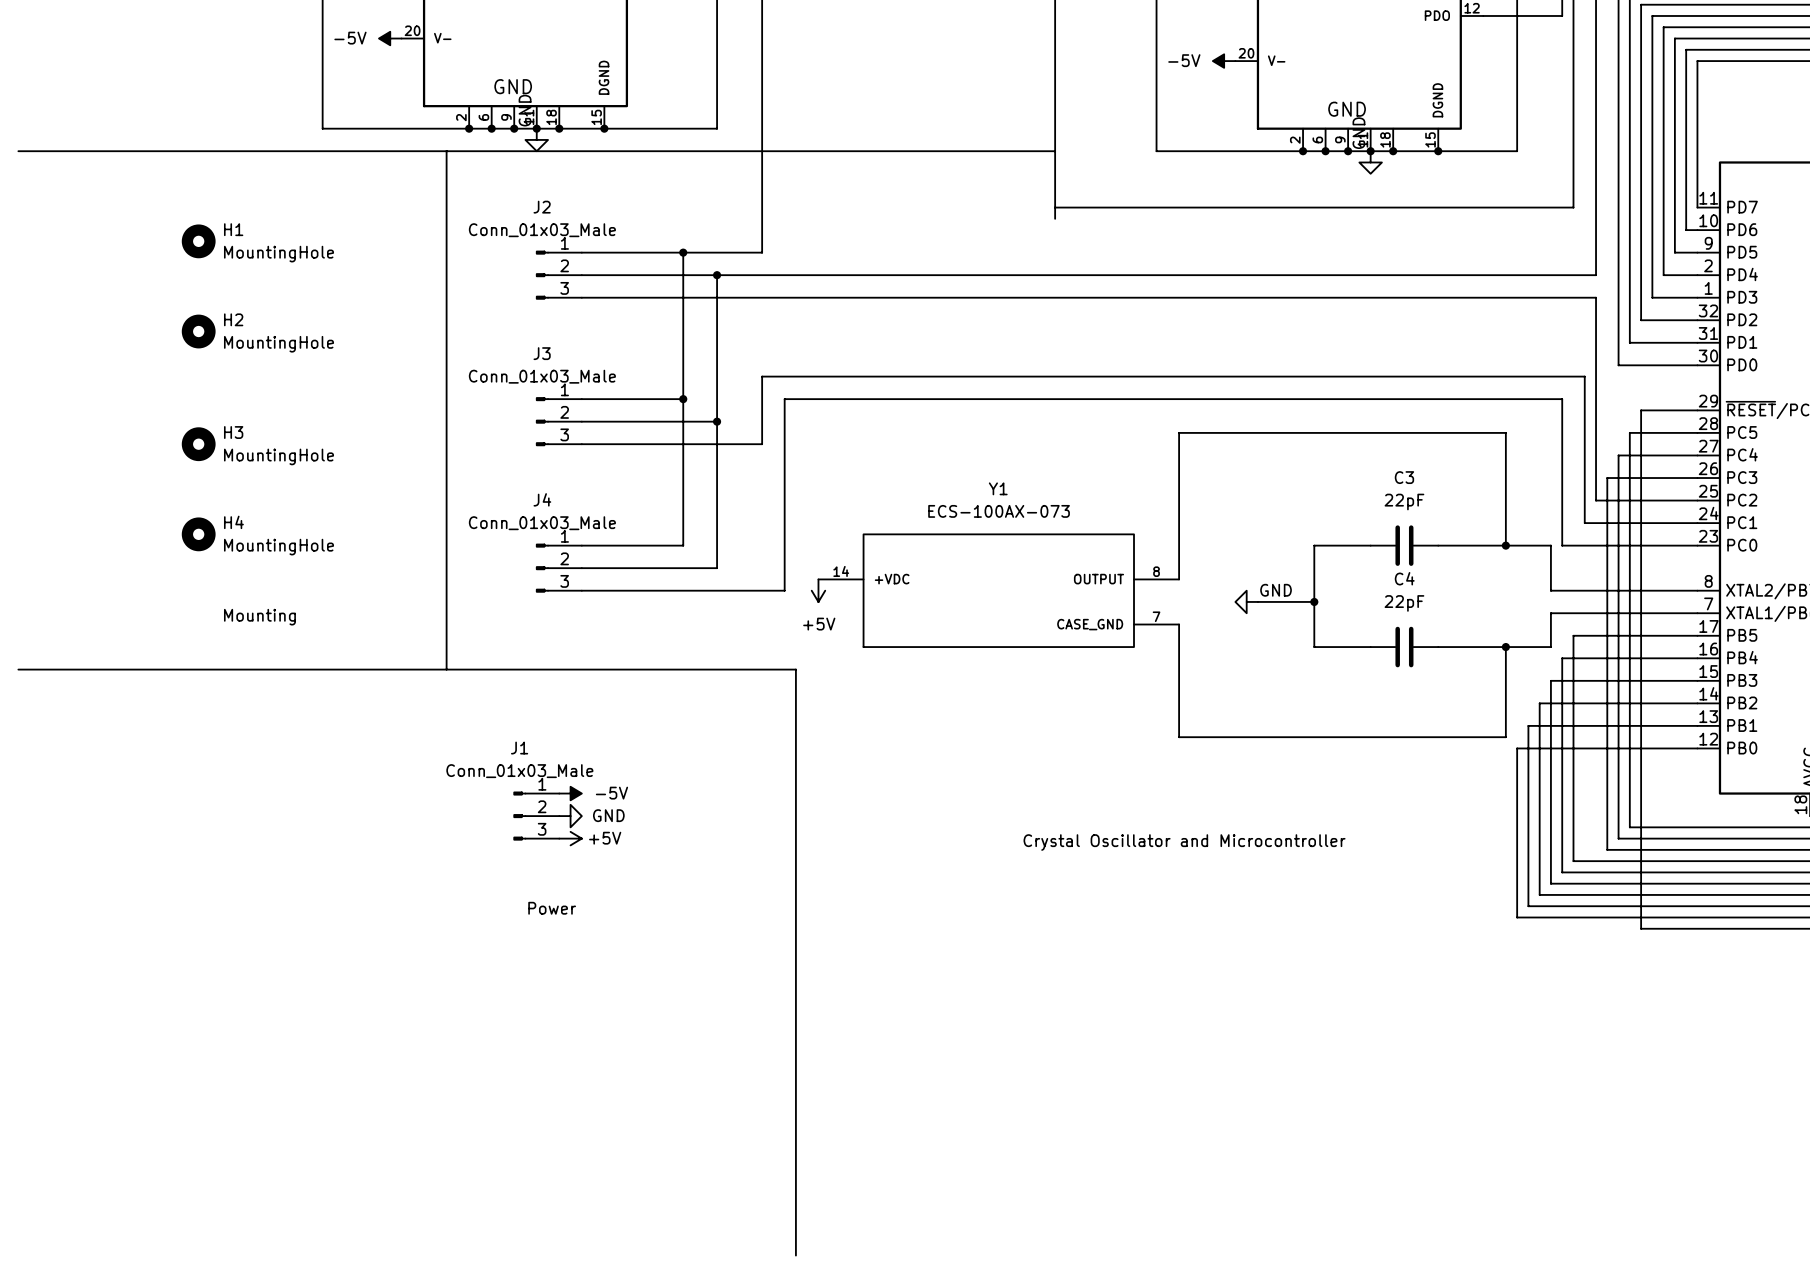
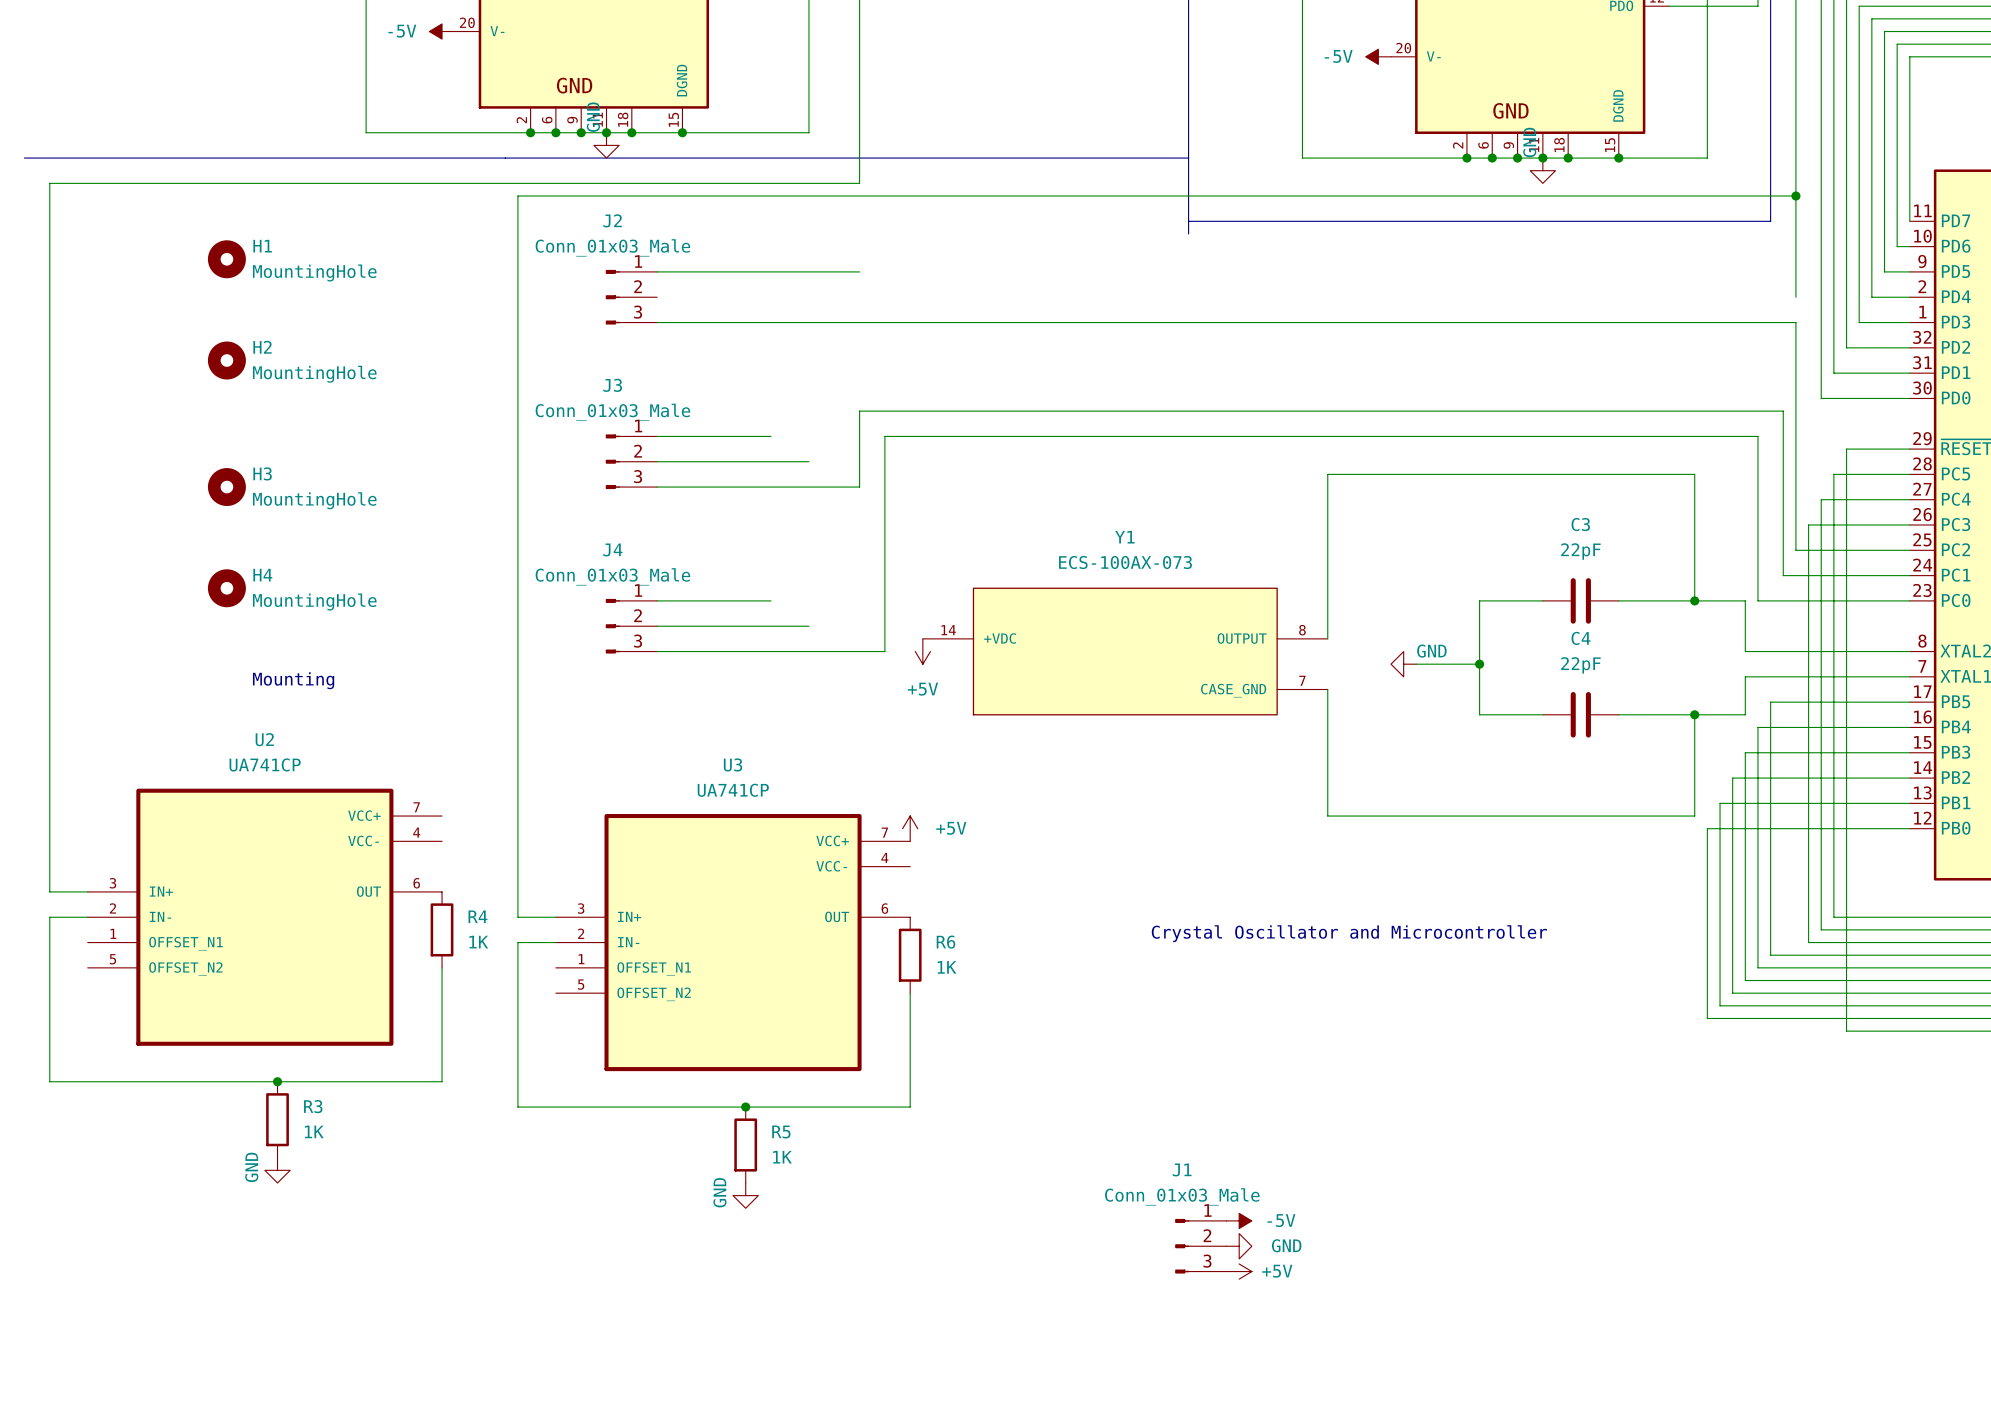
line: (446, 151) (446, 669) -> none
wire: (762, 173) (762, 252) -> (859, 183) (49, 183) (49, 891) (87, 891)
wire: none -> (1795, 196) (517, 196) (517, 917) (555, 917)
junction: none -> (1795, 196)
wire: (683, 252) (683, 545) -> none
junction: (683, 252) -> none
wire: (581, 275) (1596, 275) -> none
wire: (717, 275) (717, 568) -> none
junction: (717, 275) -> none
junction: (683, 399) -> none
junction: (717, 421) -> none
line: (18, 669) (795, 669) (795, 1255) -> none
power symbol: none -> +5V (910, 828)
power symbol: -5V (570, 793) -> none
J1 position: (536, 816) -> (1200, 1246)
power symbol: GND (570, 816) -> none
wire: none -> (87, 917) (49, 917) (49, 1081) (442, 1081) (442, 967)
U2: none -> UA741CP (264, 917)
R4: none -> 1K (442, 929)
power symbol: +5V (570, 838) -> none
wire: none -> (555, 942) (517, 942) (517, 1107) (910, 1107) (910, 993)
U3: none -> UA741CP (733, 942)
R6: none -> 1K (910, 955)
text: Power (552, 908) -> none
junction: none -> (277, 1081)
junction: none -> (745, 1107)
R3: none -> 1K (277, 1119)
R5: none -> 1K (745, 1145)
power symbol: none -> GND (277, 1170)
power symbol: none -> GND (745, 1195)
power symbol: none -> -5V (1239, 1220)
power symbol: none -> GND (1239, 1246)
power symbol: none -> +5V (1239, 1271)

